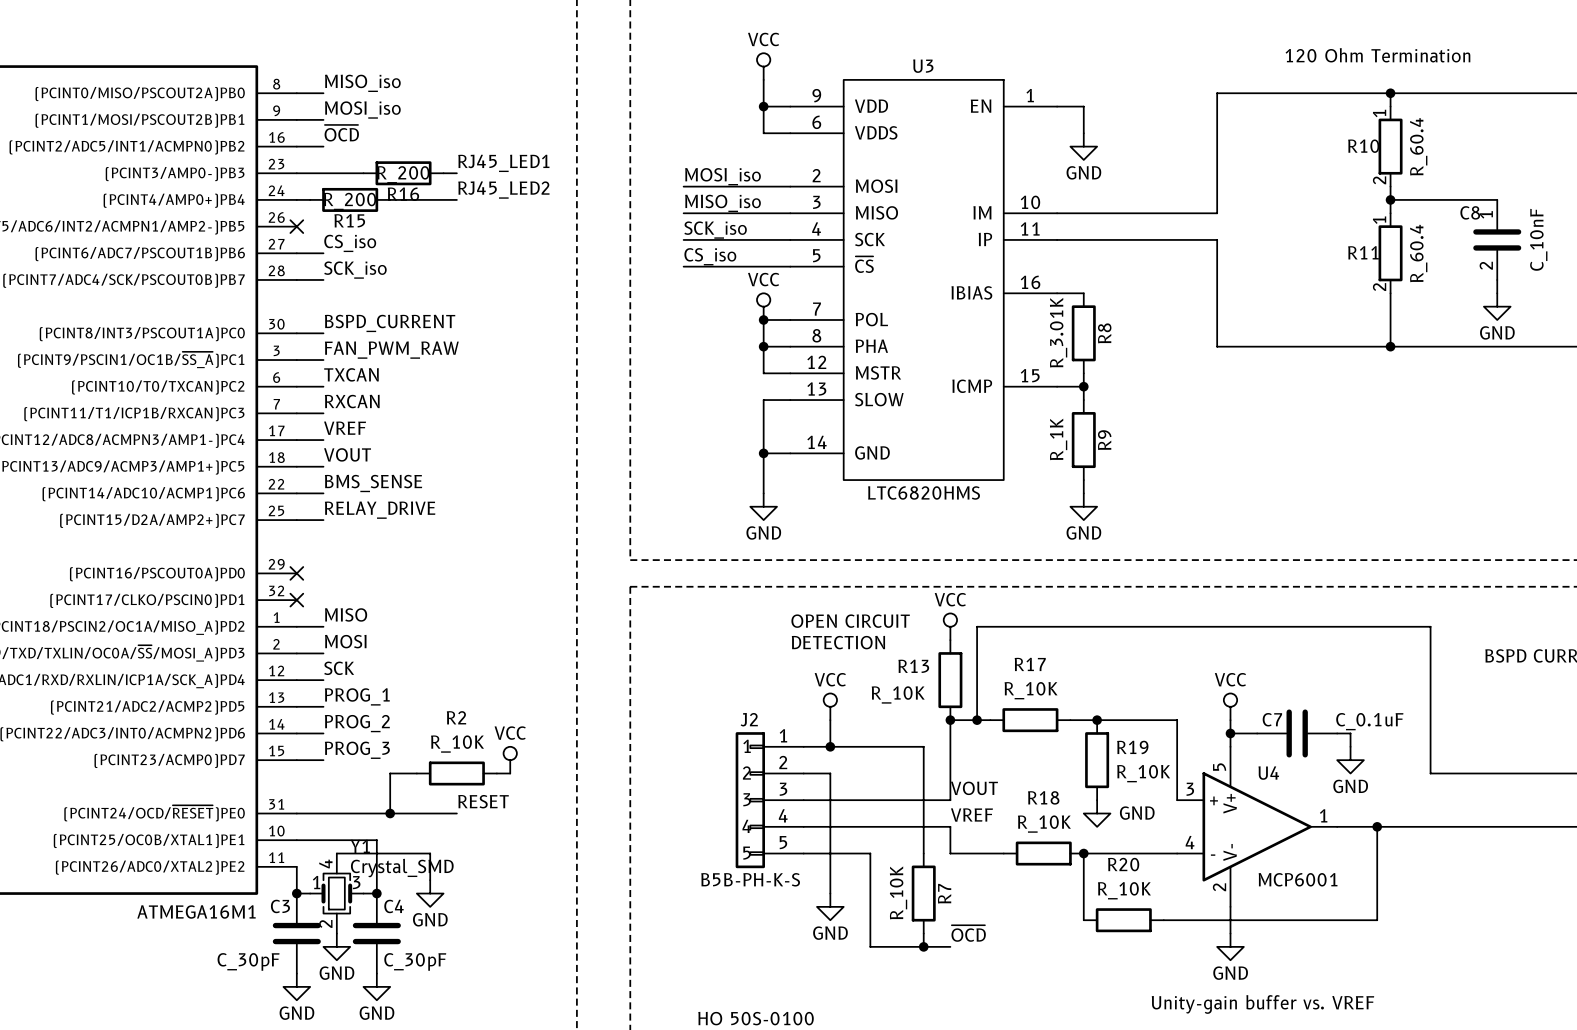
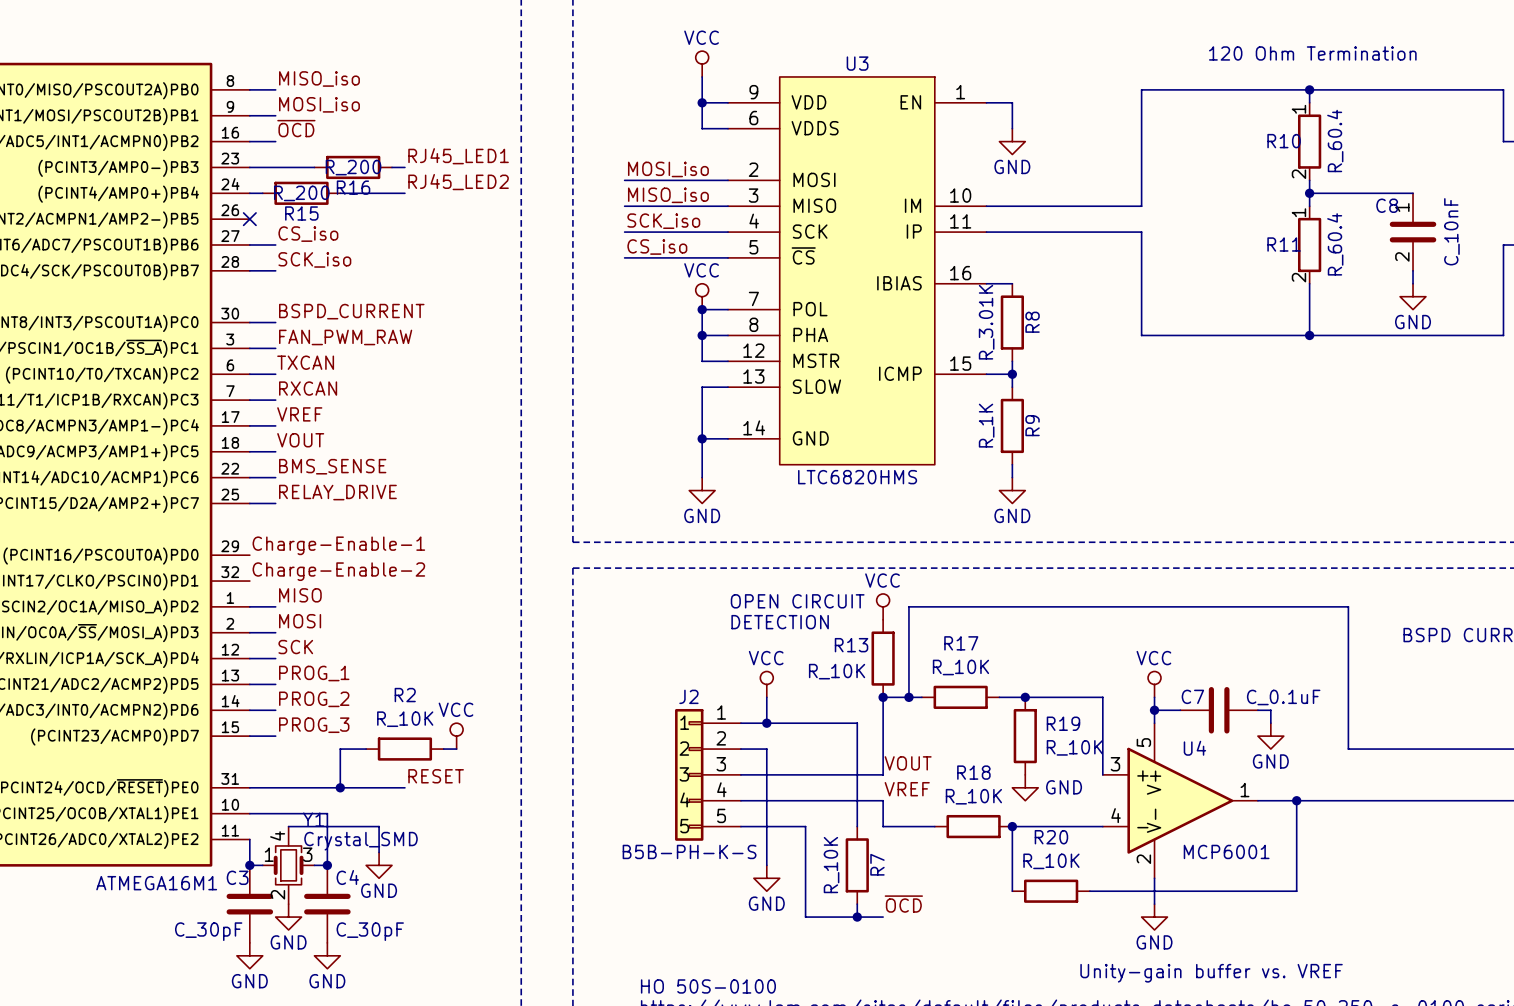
label: none -> Charge-Enable-1 (338, 545)
no-connect mark: (296, 573) -> none
label: none -> Charge-Enable-2 (338, 571)
no-connect mark: (296, 600) -> none

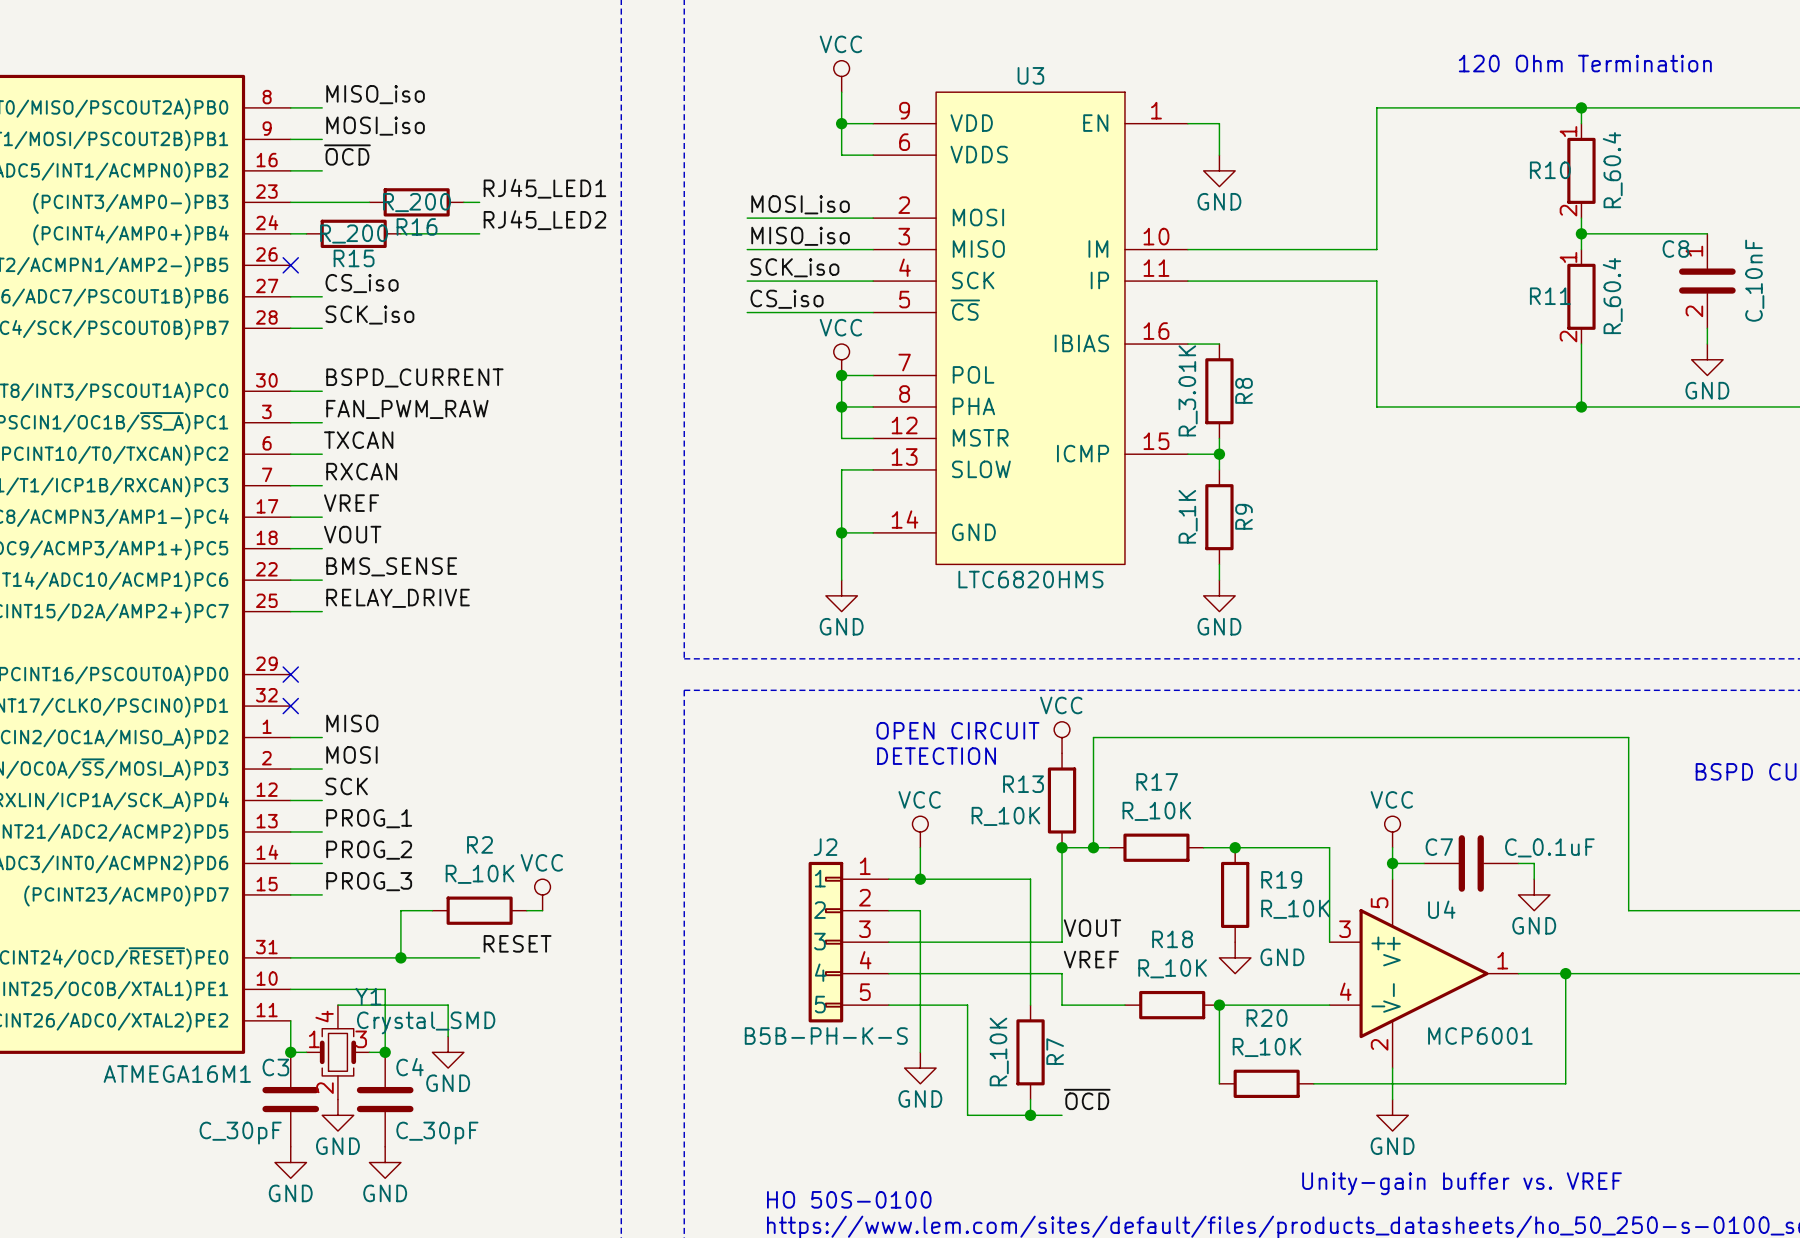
label: Charge-Enable-1 (338, 545) -> none
no-connect mark: none -> (290, 674)
label: Charge-Enable-2 (338, 571) -> none
no-connect mark: none -> (290, 706)

